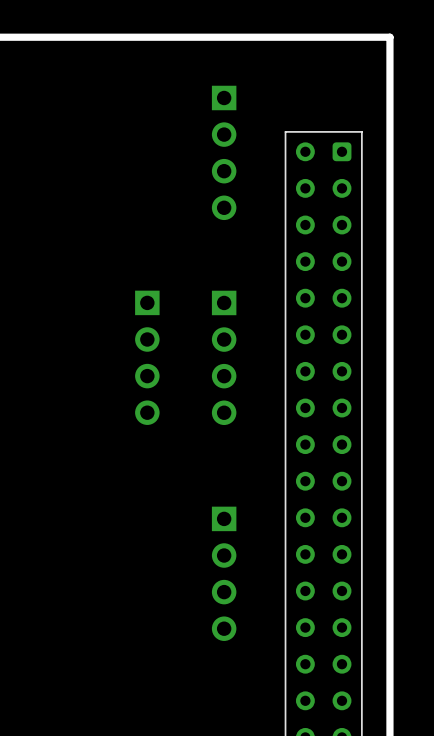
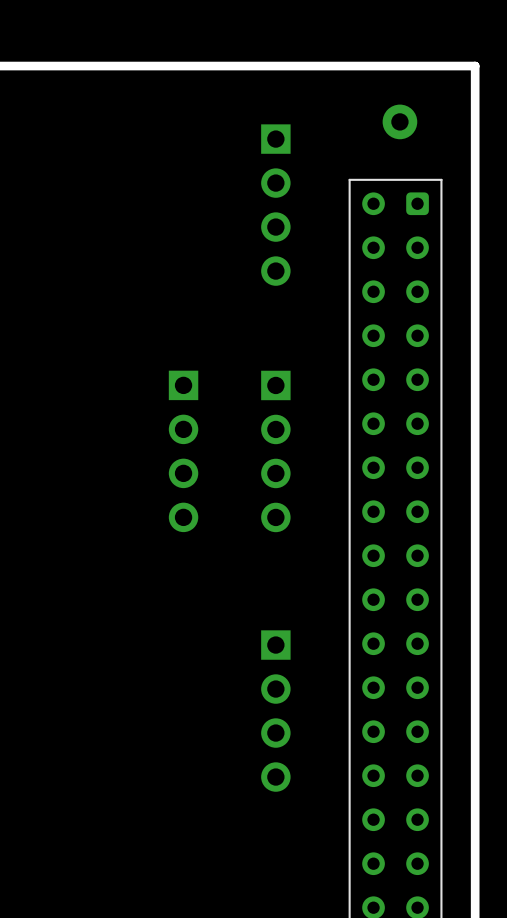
part: none -> (399, 121)

